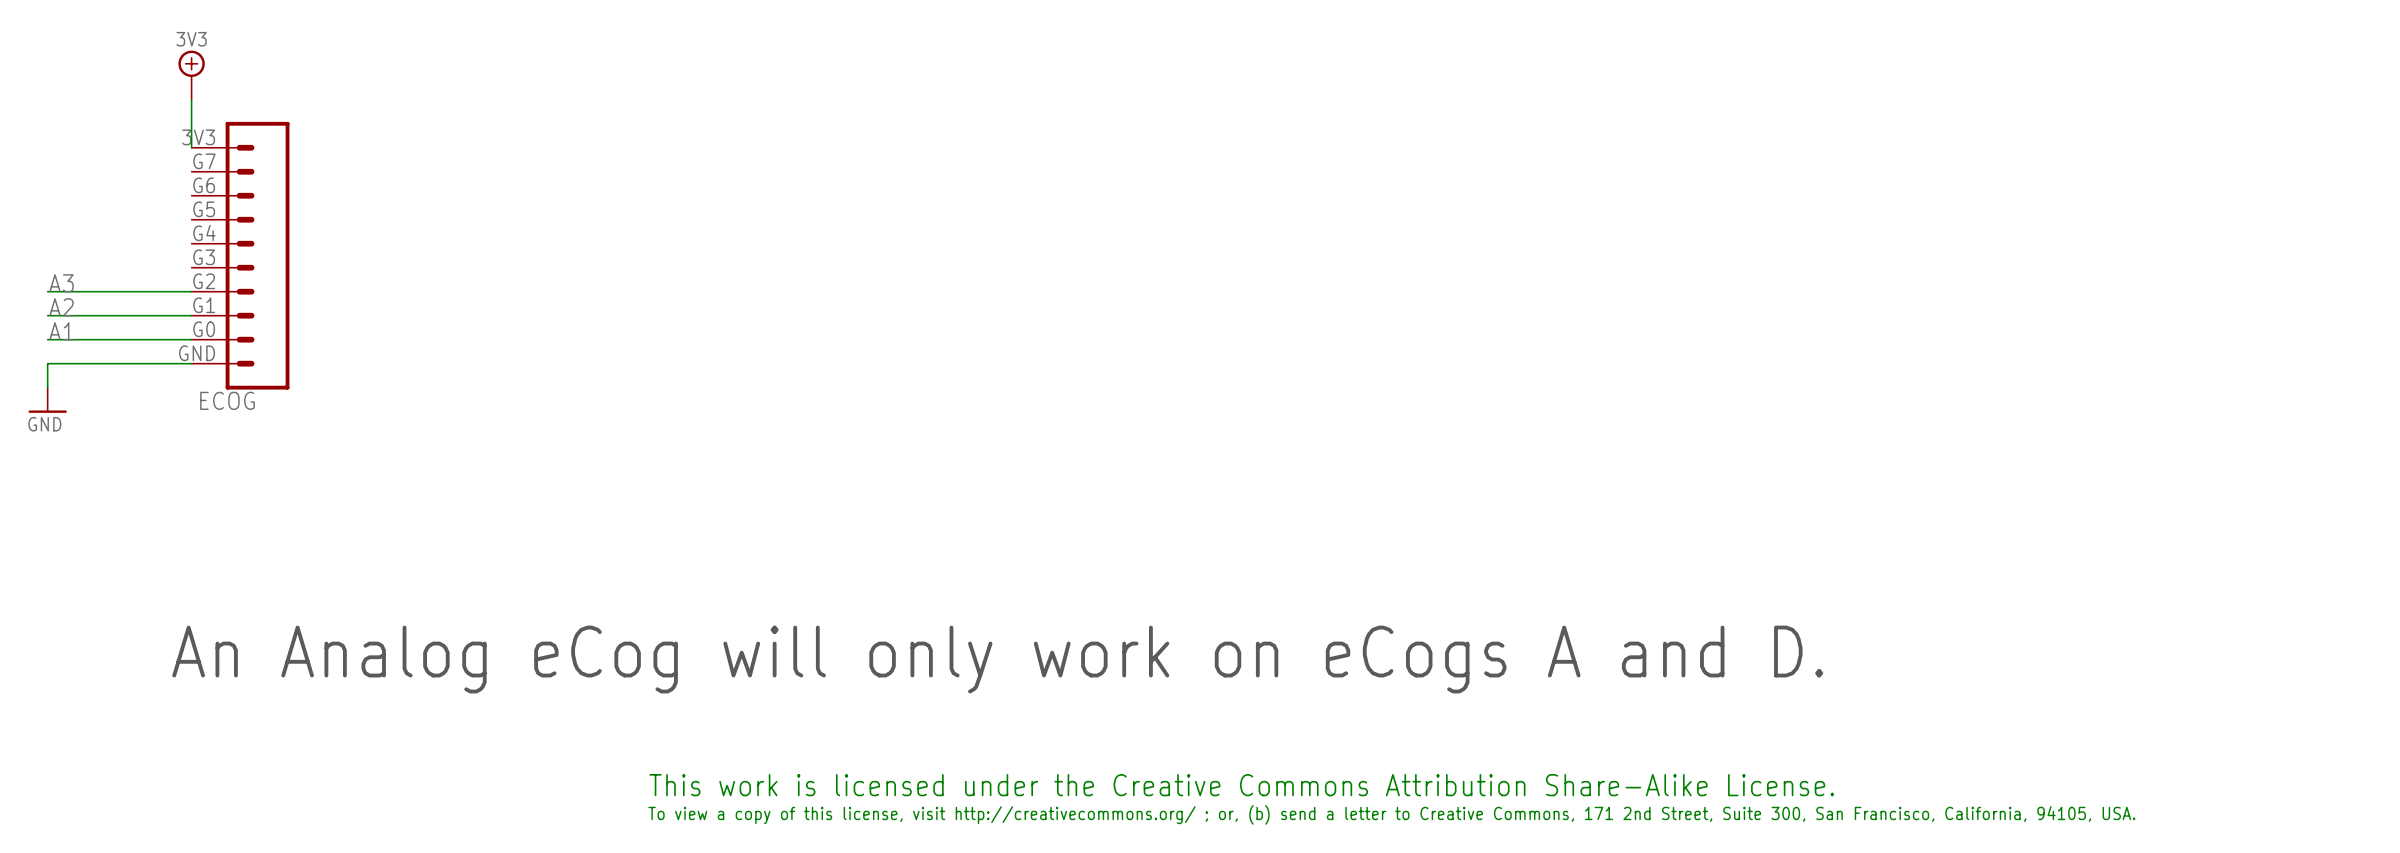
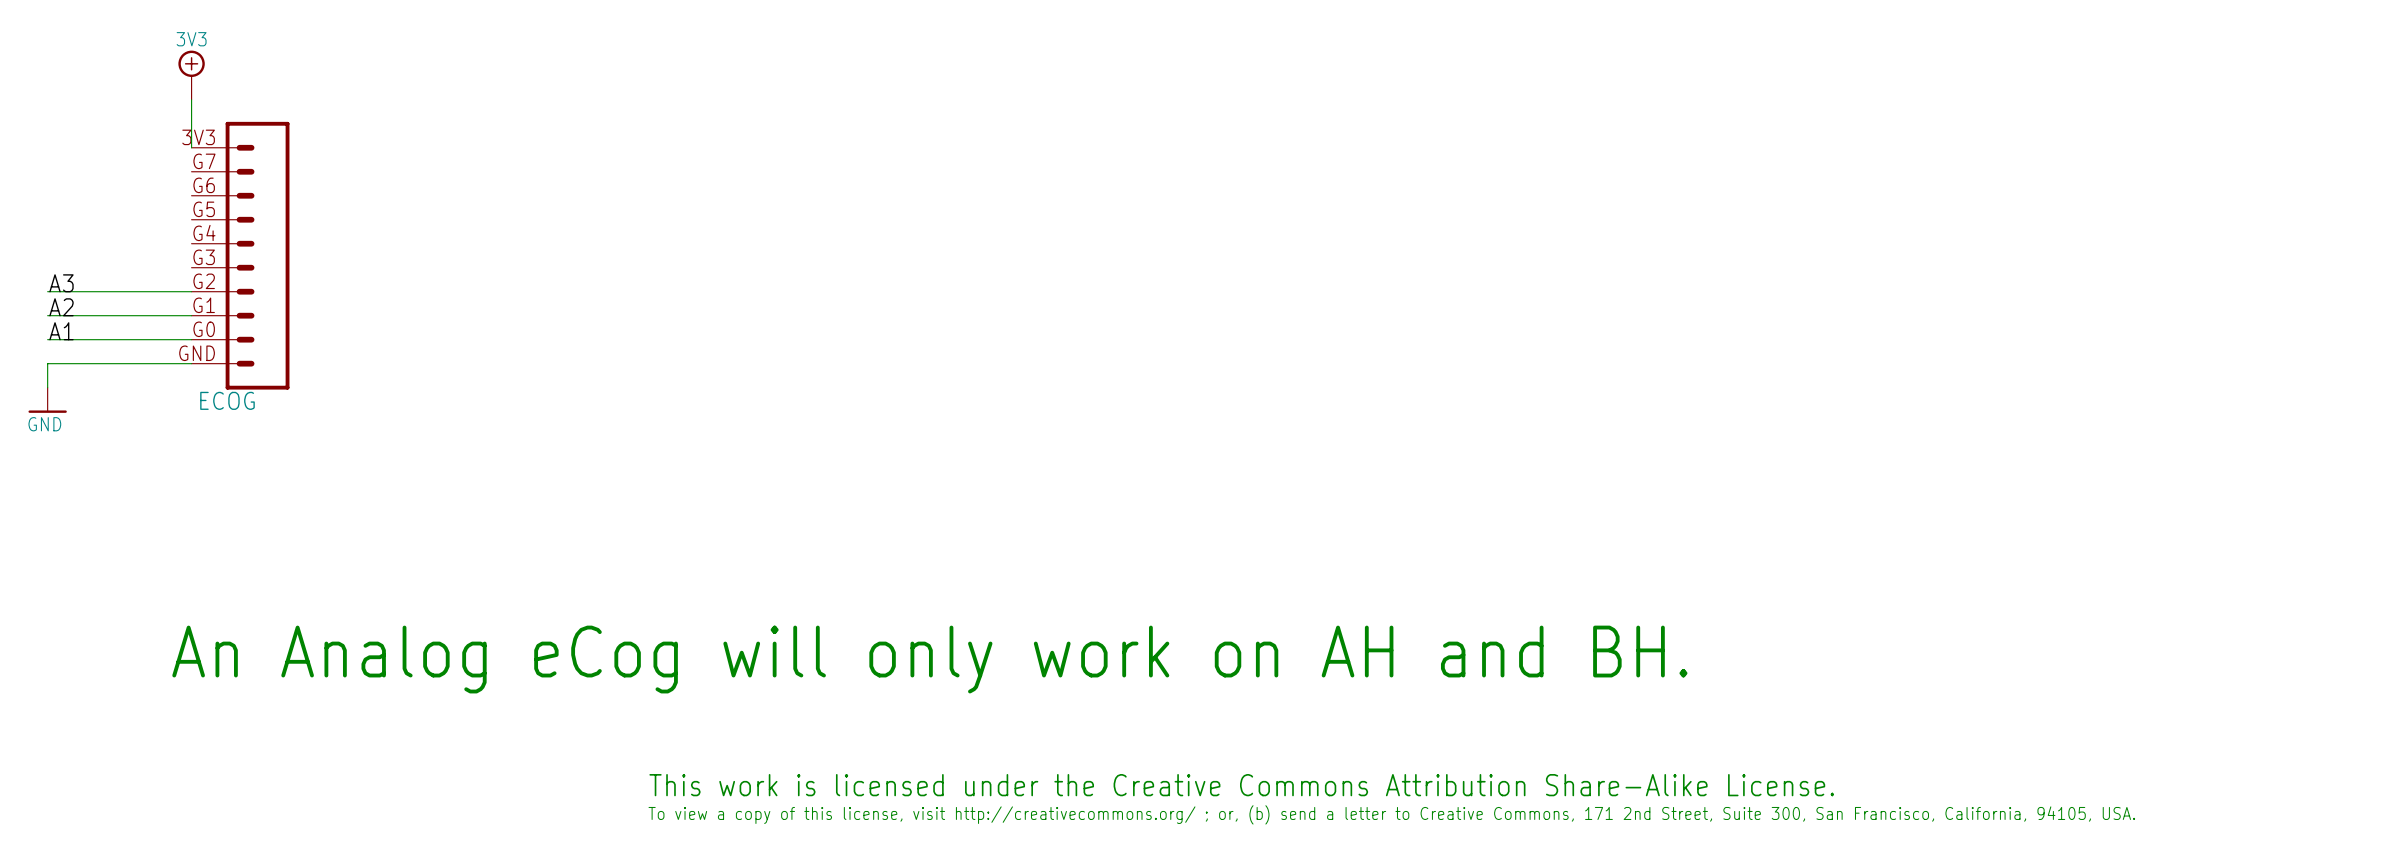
text: An Analog eCog will only work on eCogs A and D. (997, 659) -> An Analog eCog will only work on AH and BH. (929, 659)

